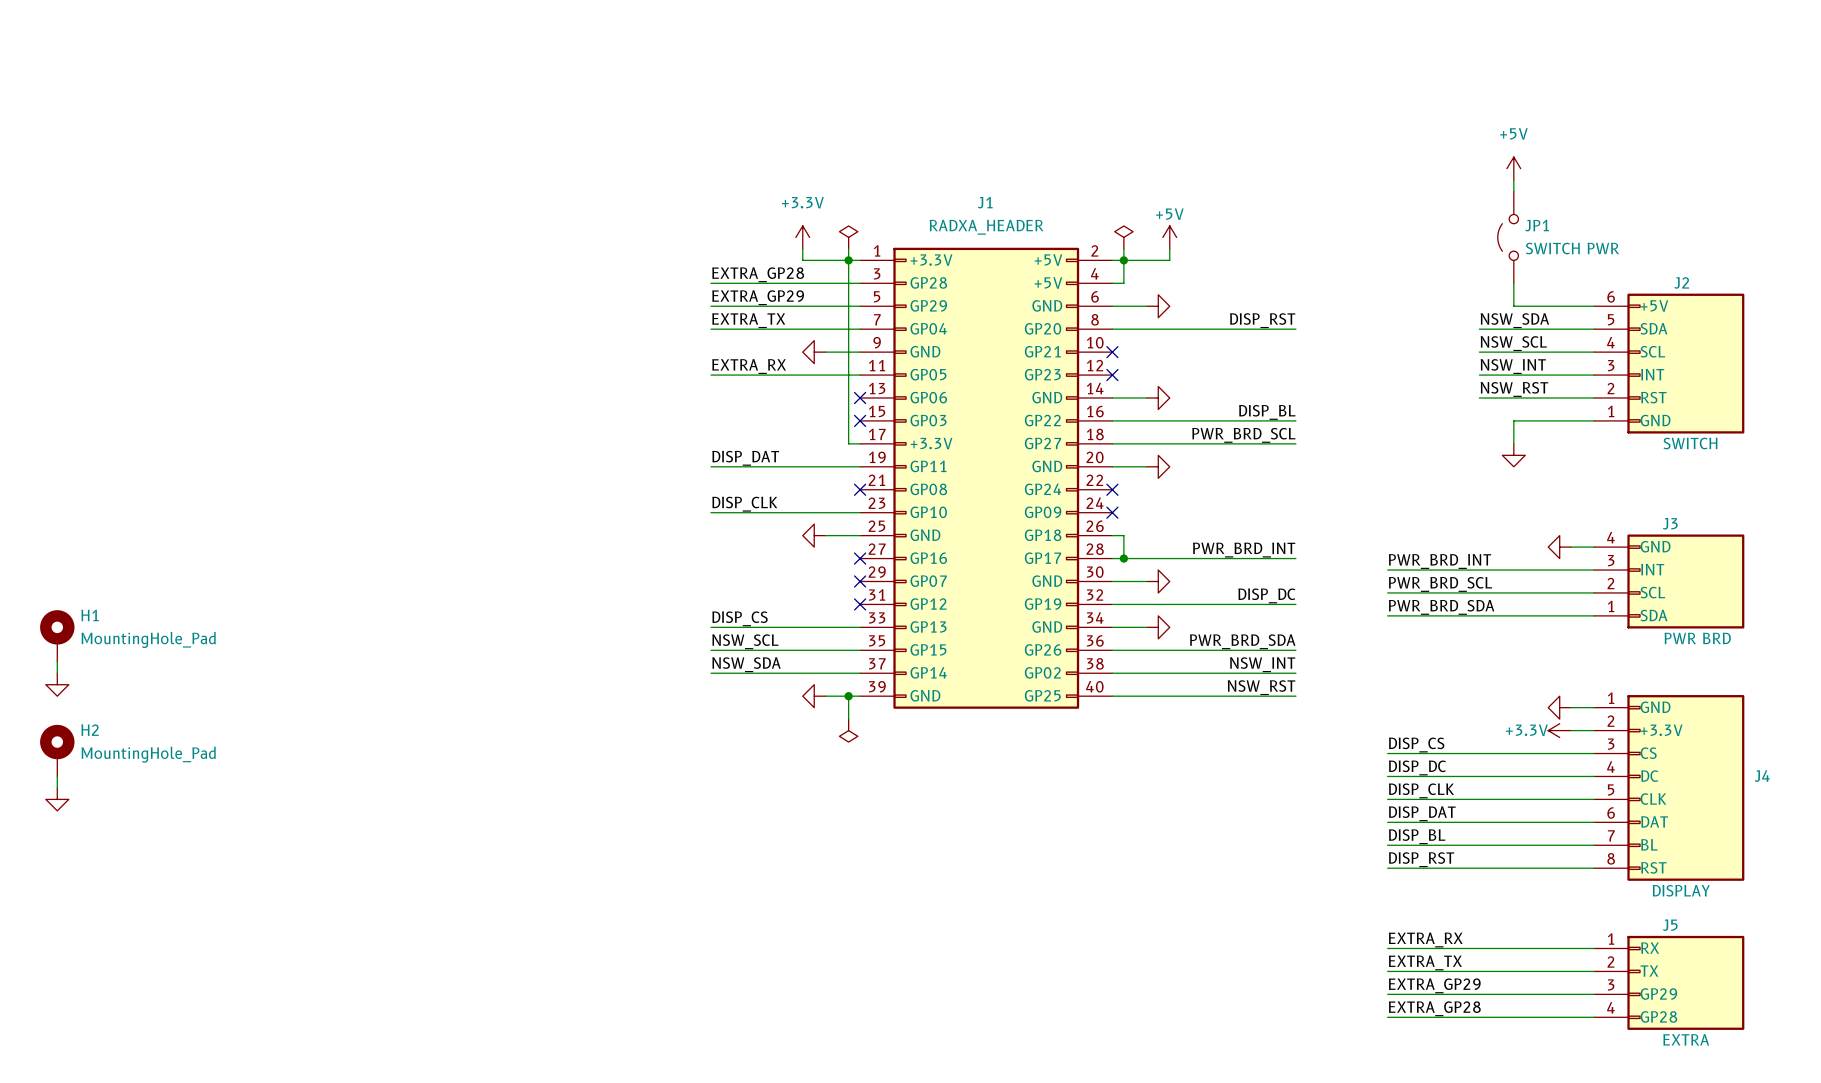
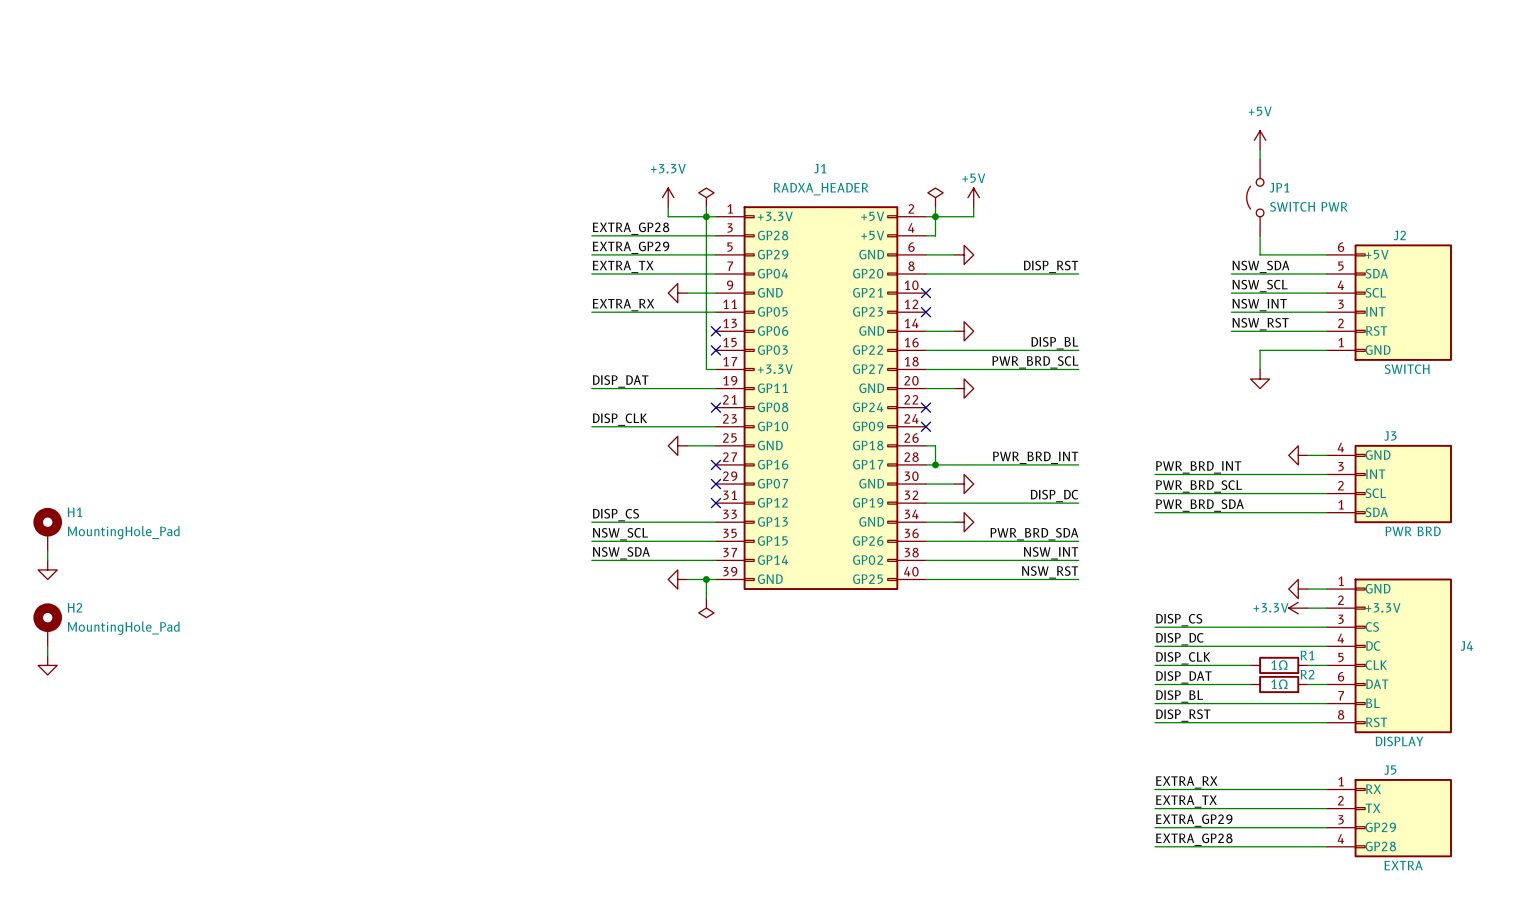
wire: (1502, 799) (1571, 799) -> none
R1: none -> 1Ω (1279, 665)
wire: (1502, 822) (1571, 822) -> none
R2: none -> 1Ω (1279, 684)

